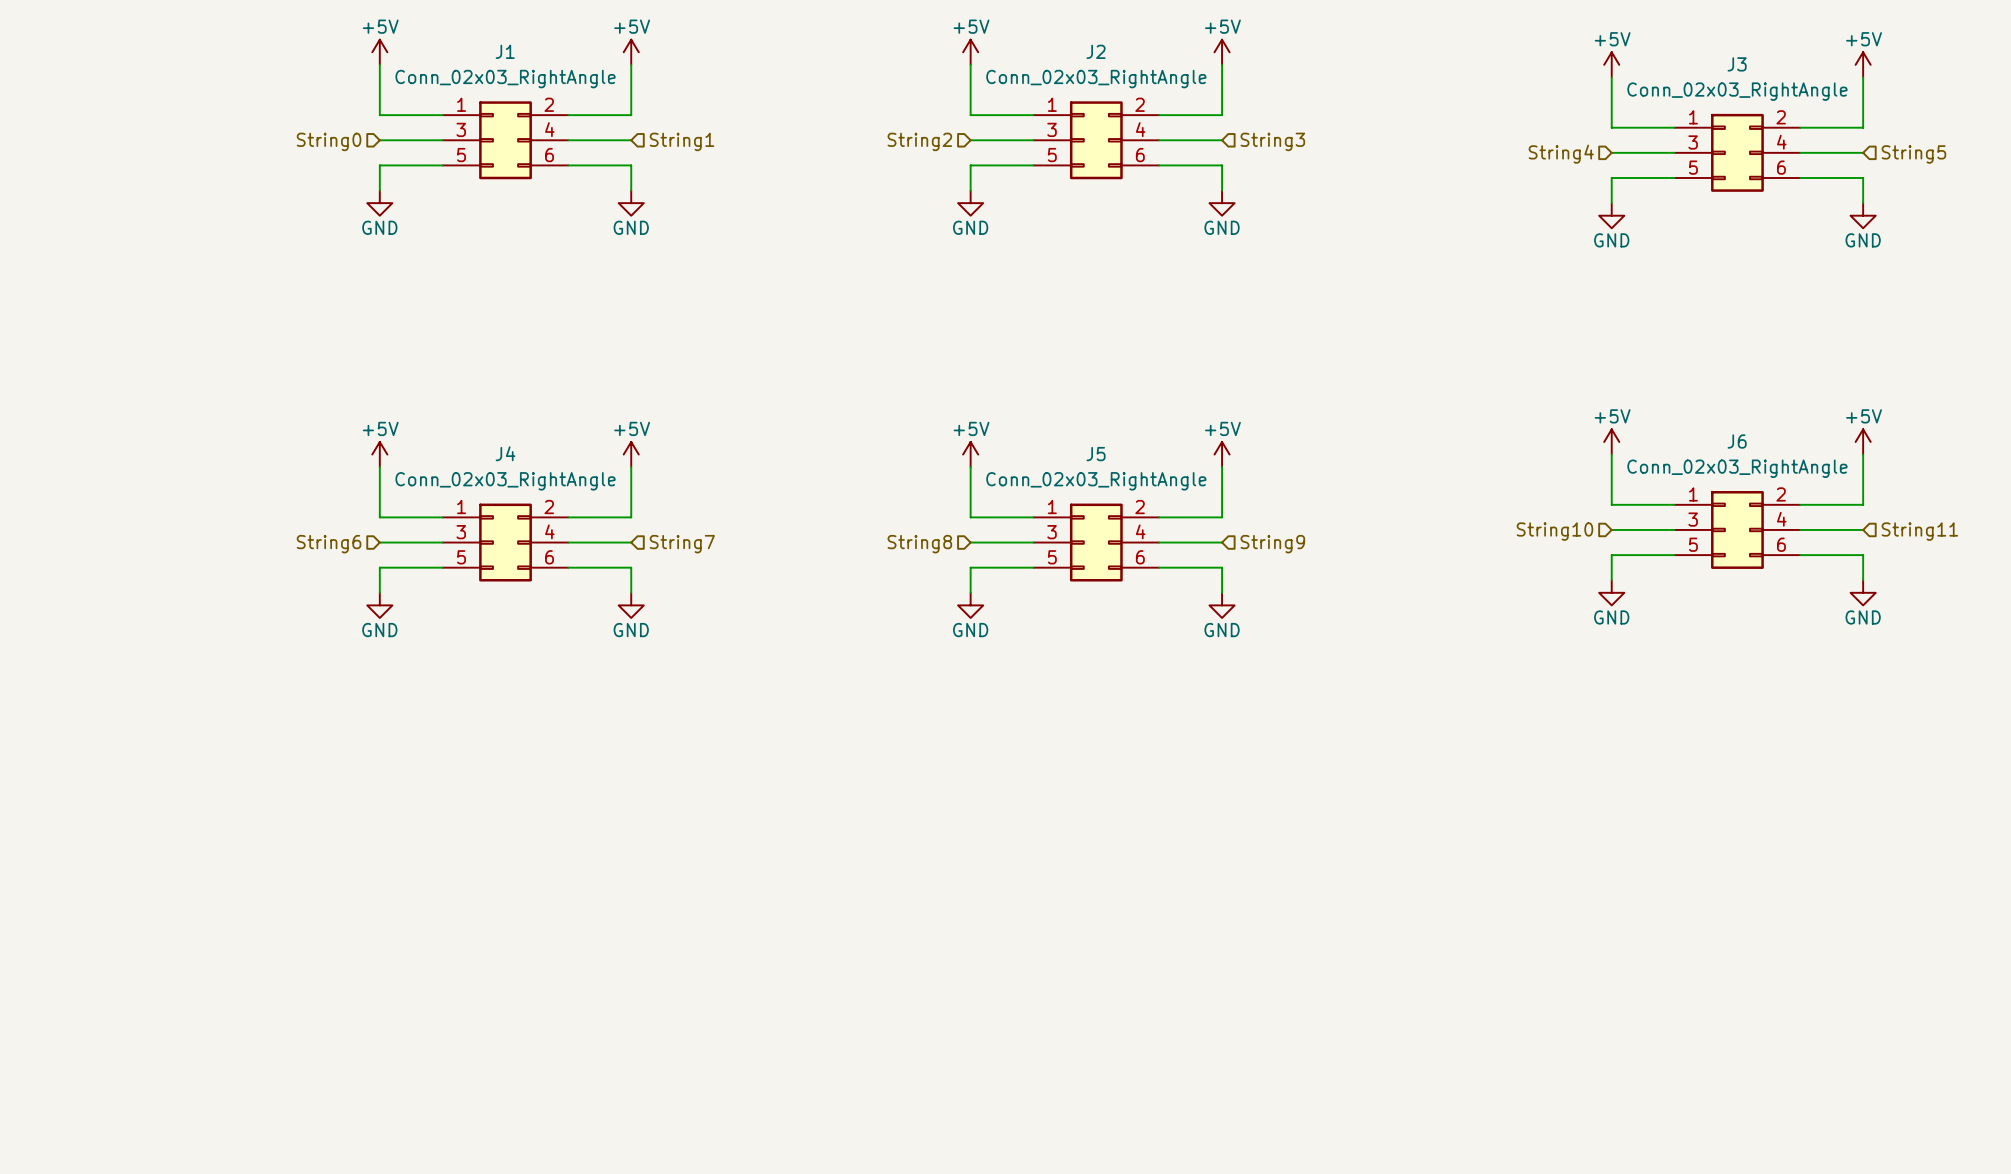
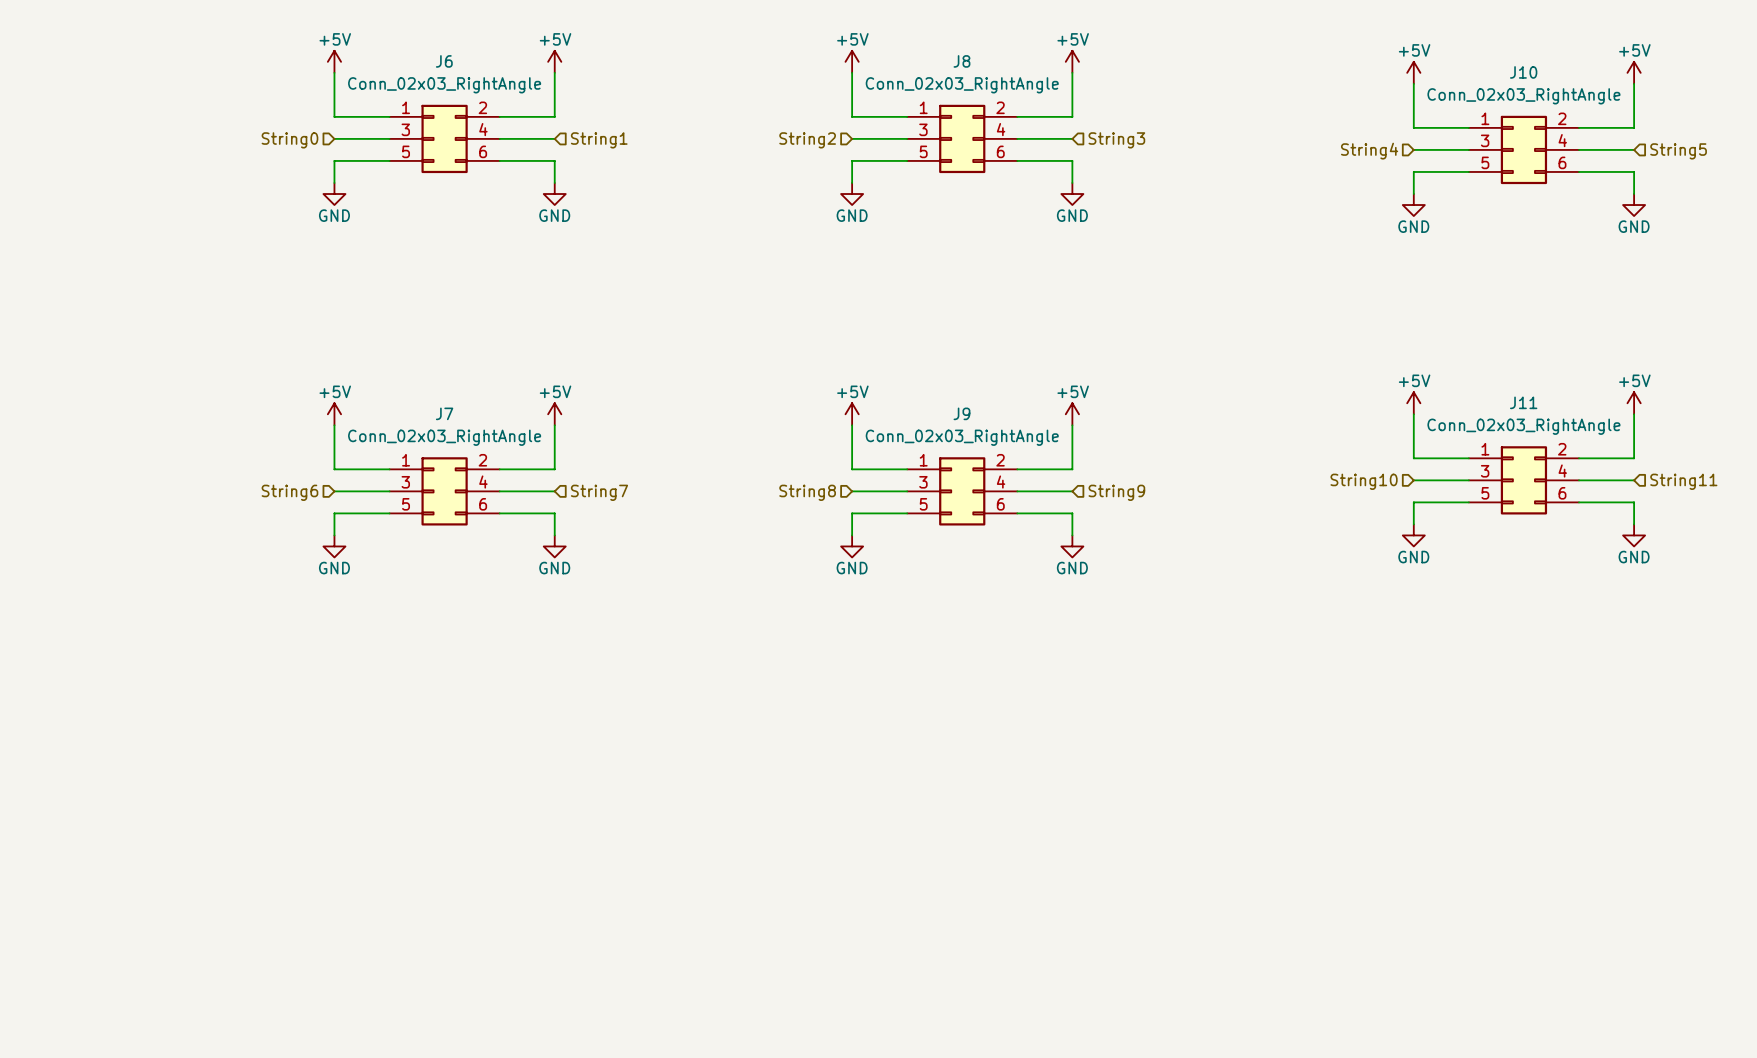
J1 name: J1 (505, 51) -> J6 (444, 61)
J2 name: J2 (1096, 51) -> J8 (961, 61)
J3 name: J3 (1737, 64) -> J10 (1523, 72)
J6 name: J6 (1737, 441) -> J11 (1523, 402)
J4 name: J4 (505, 453) -> J7 (444, 413)
J5 name: J5 (1096, 454) -> J9 (961, 413)

